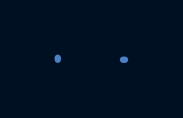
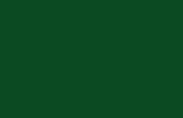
track: (57, 57) (57, 59) -> none
track: (124, 59) (123, 59) -> none

